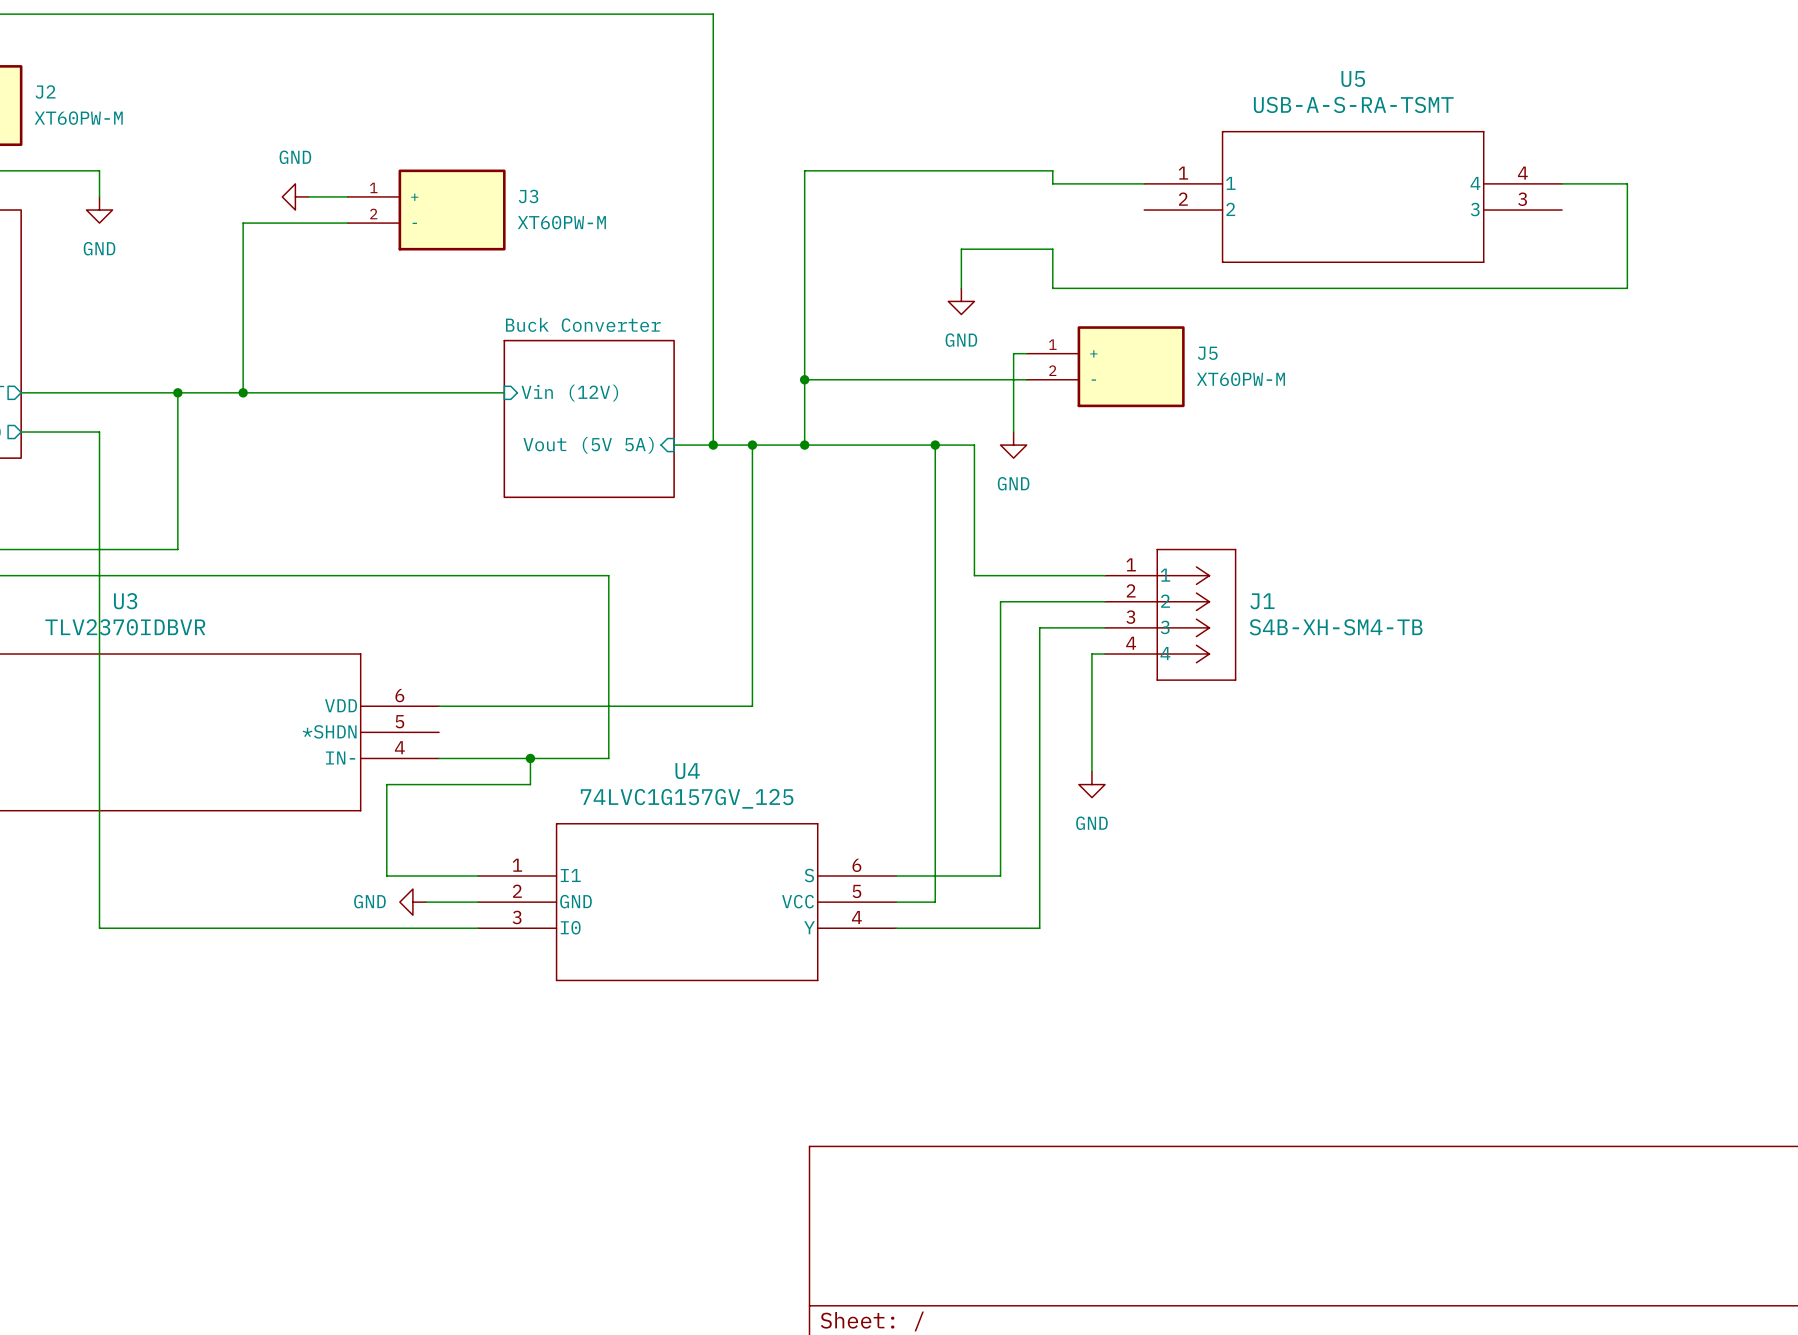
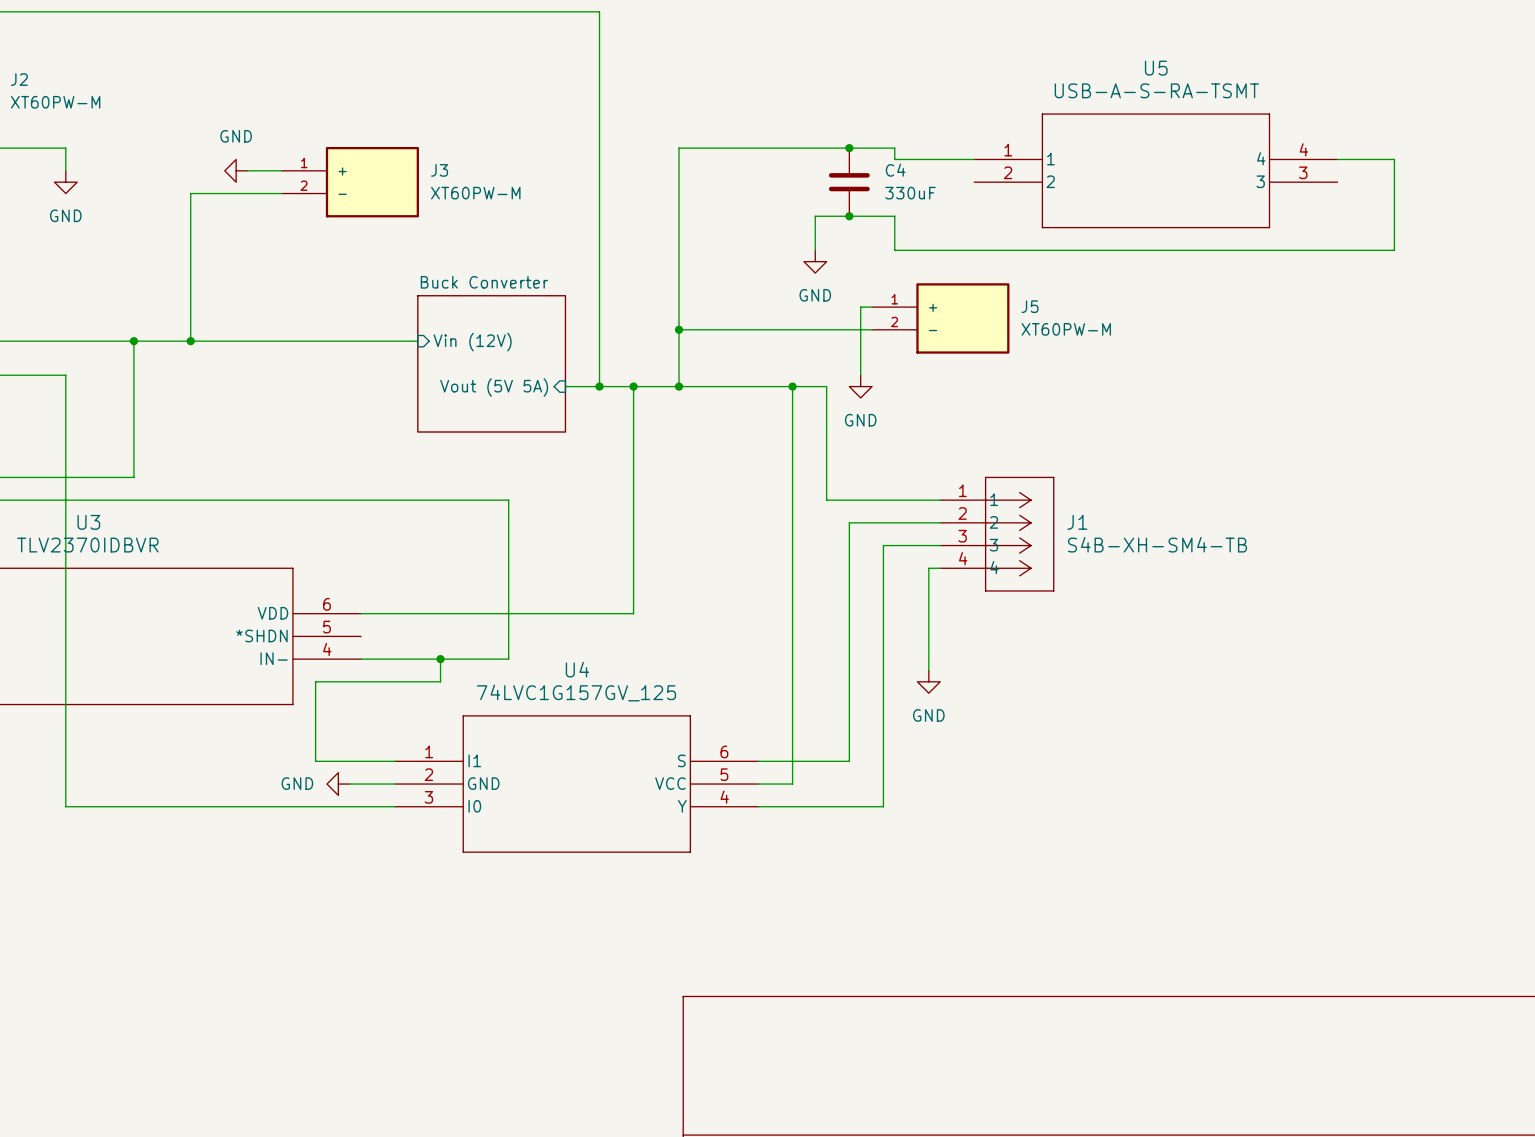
junction: none -> (849, 148)
C4: none -> 330uF (849, 182)
junction: none -> (849, 216)

